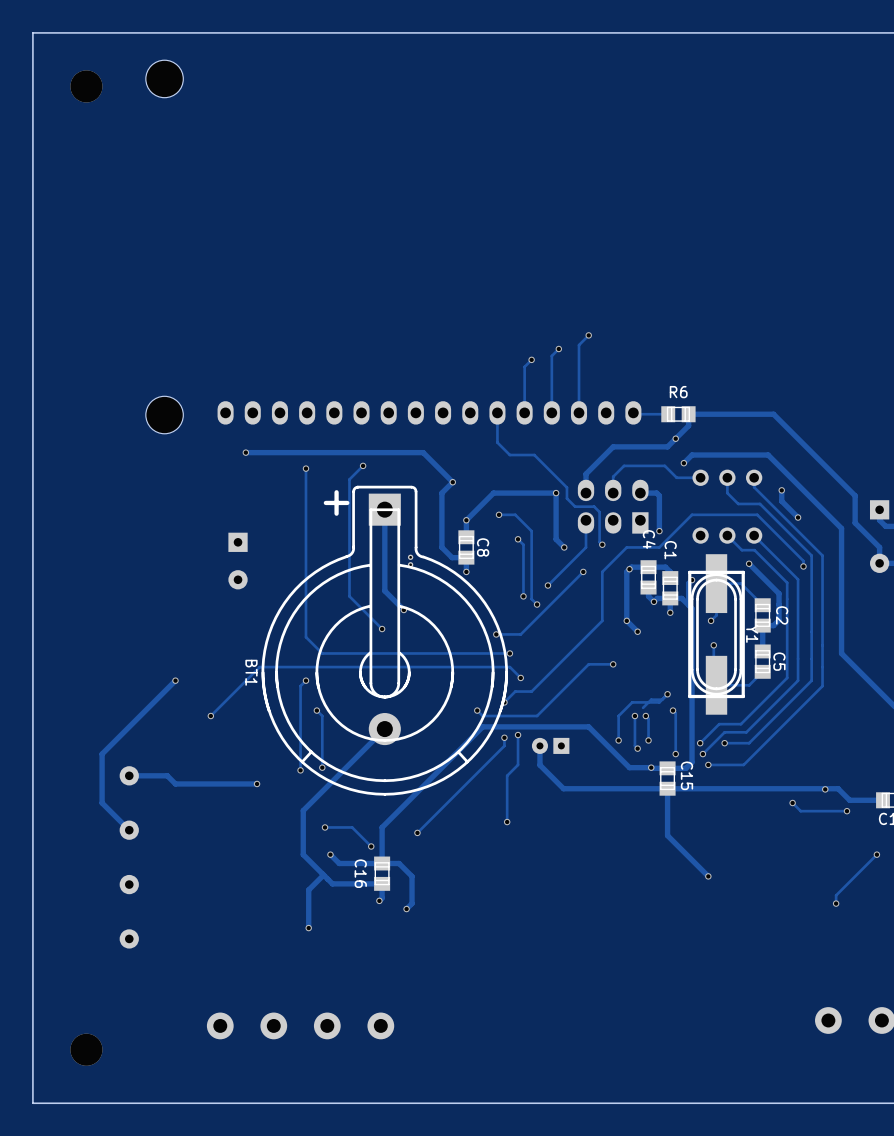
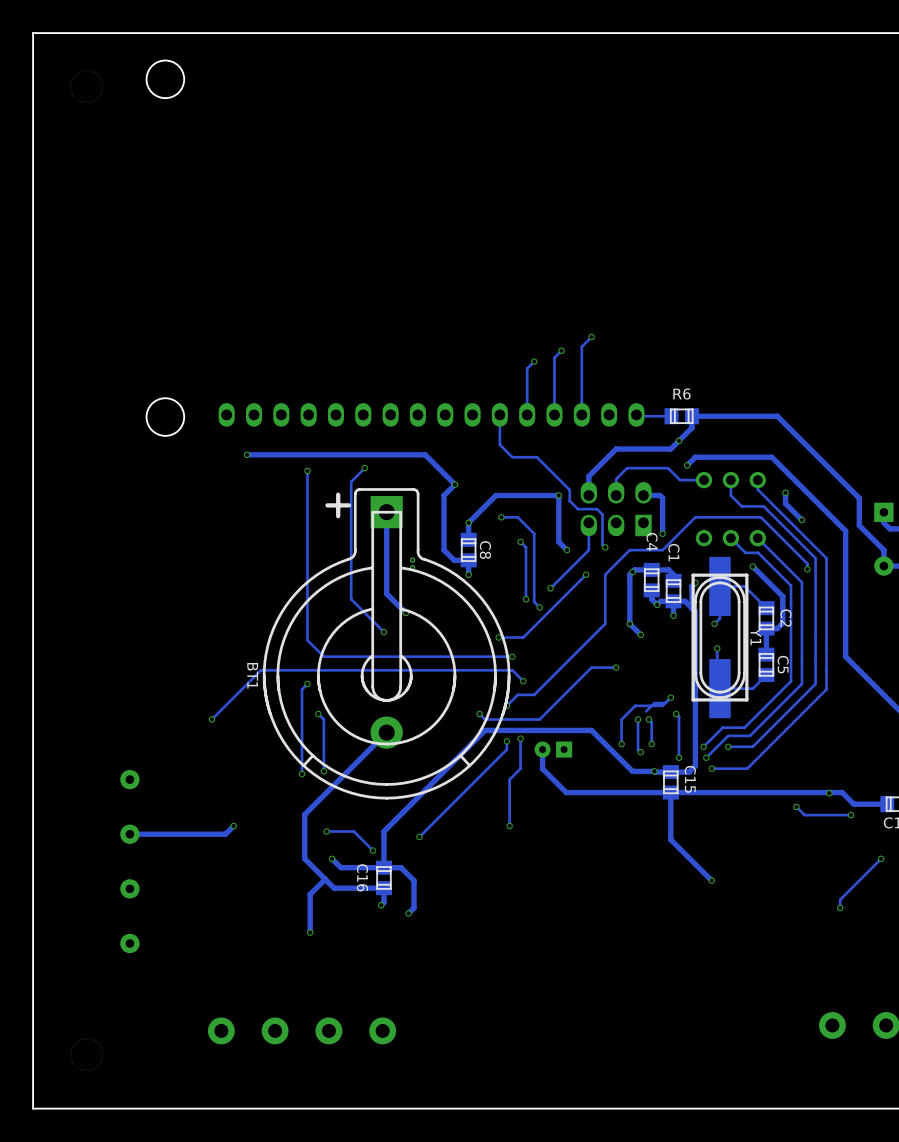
part: (238, 561) -> none
track: (175, 680) (102, 754) (102, 803) (129, 830) (126, 830) -> none
via: (175, 680) -> none
track: (129, 775) (167, 775) (175, 783) (257, 783) -> none
via position: (257, 783) -> (233, 826)
track: none -> (233, 826) (225, 834) (129, 834)

